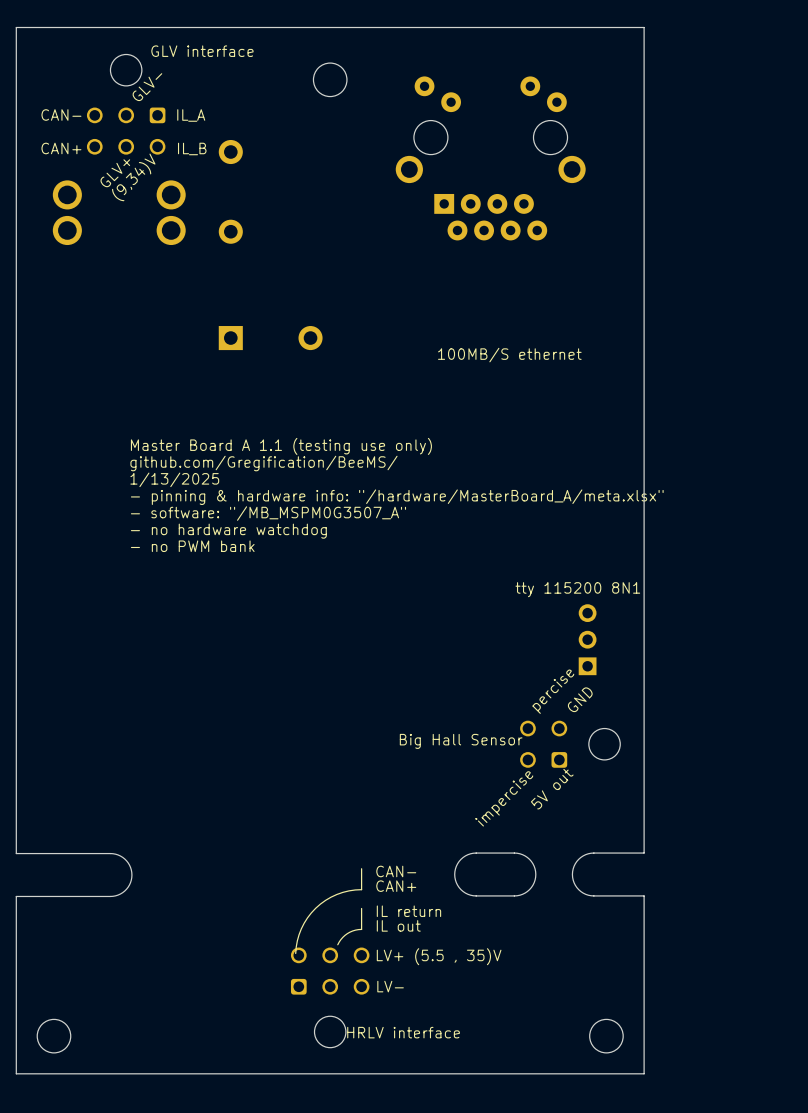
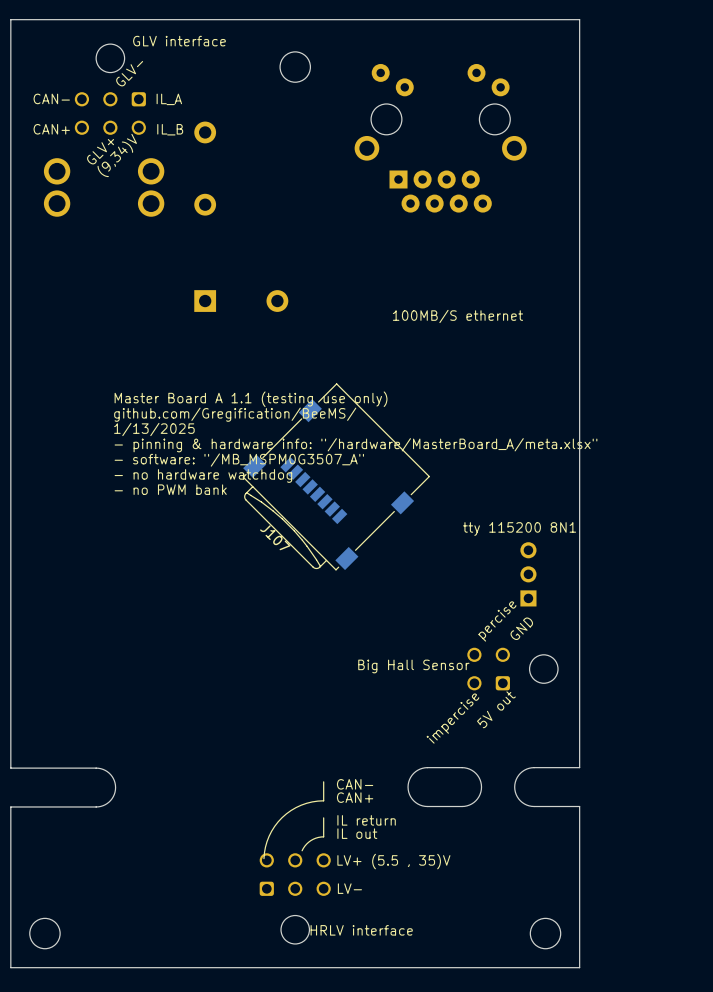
J107: none -> (336, 476)

